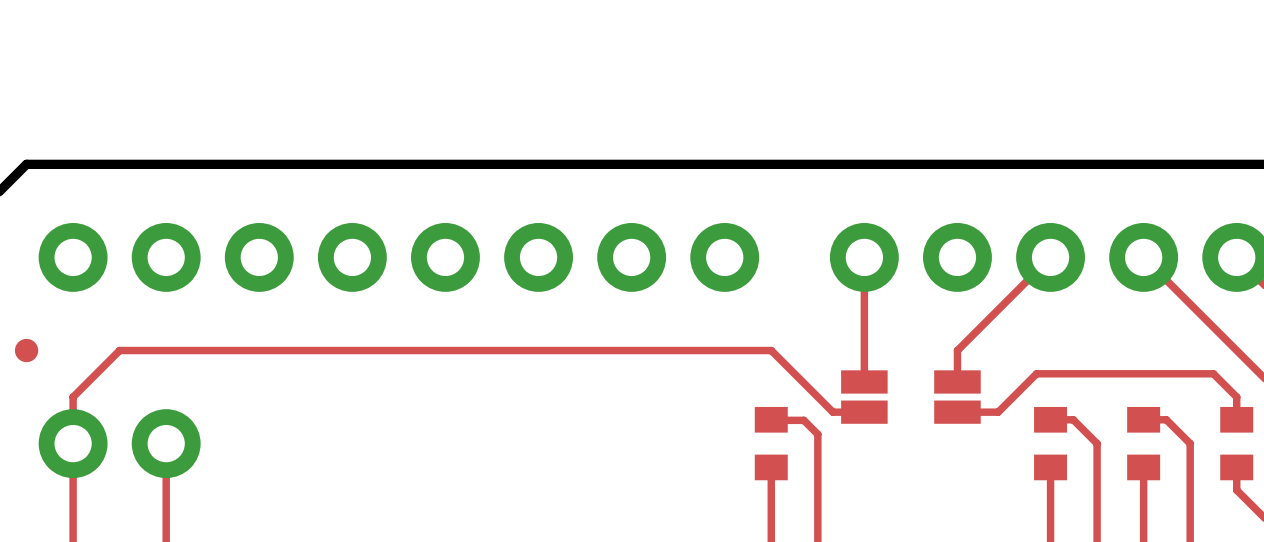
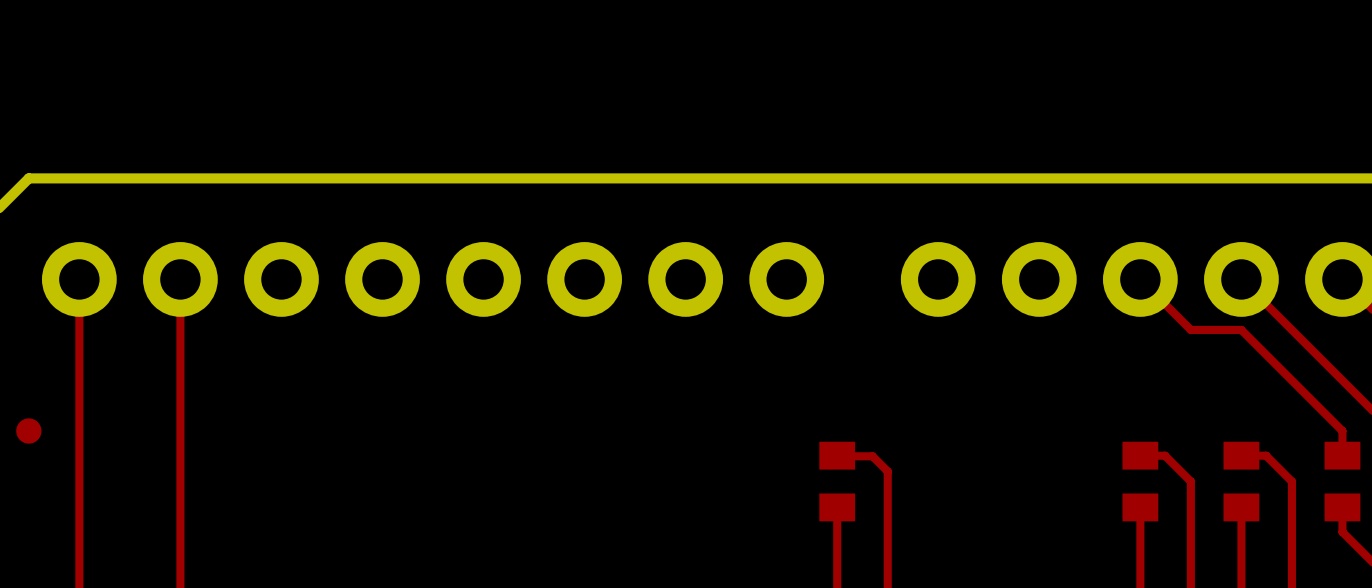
top track: none -> (180, 279) (180, 481)
top track: (864, 257) (864, 381) -> none
top track: (1050, 257) (957, 350) (957, 381) -> none
part position: (26, 350) -> (28, 431)
top track: (1213, 373) (1036, 373) (998, 412) (957, 412) -> (1317, 405) (1241, 329) (1190, 329) (1140, 279)
top track: (73, 397) (119, 350) (771, 350) (832, 412) (864, 412) -> (79, 431) (79, 279)
part: (864, 397) -> none
part: (957, 397) -> none
part: (119, 443) -> none

